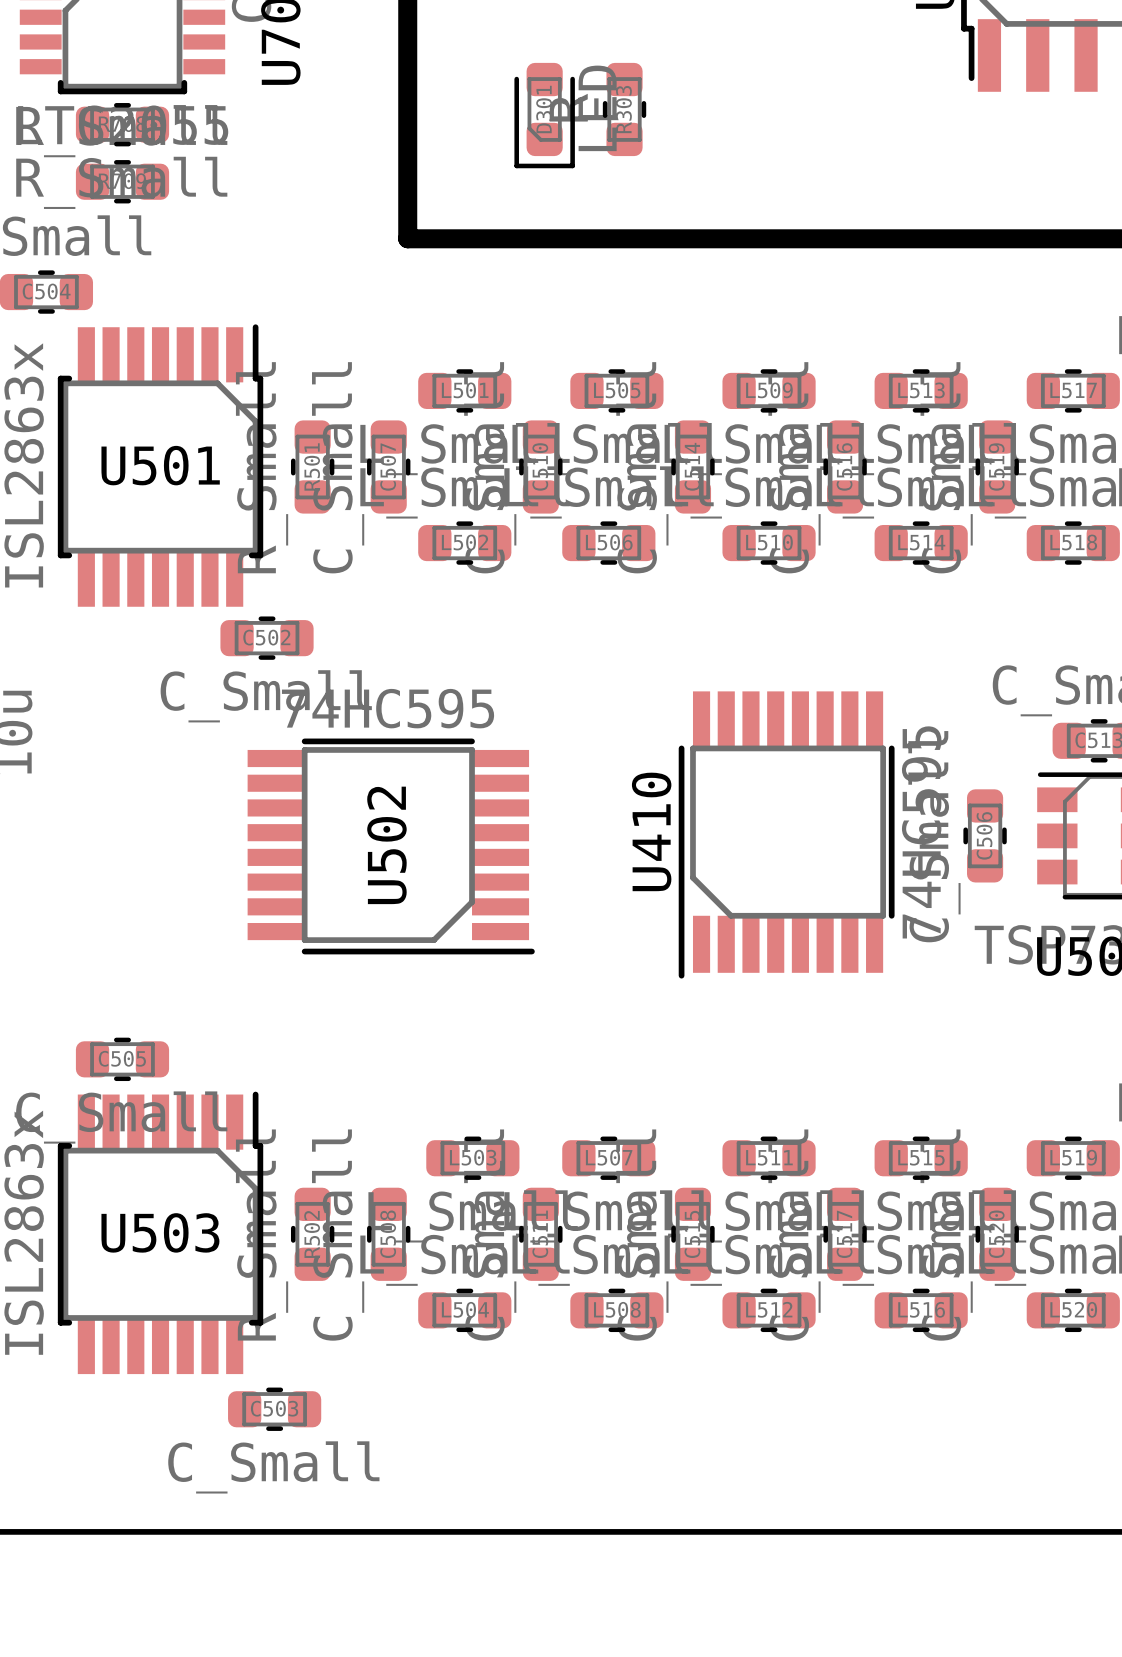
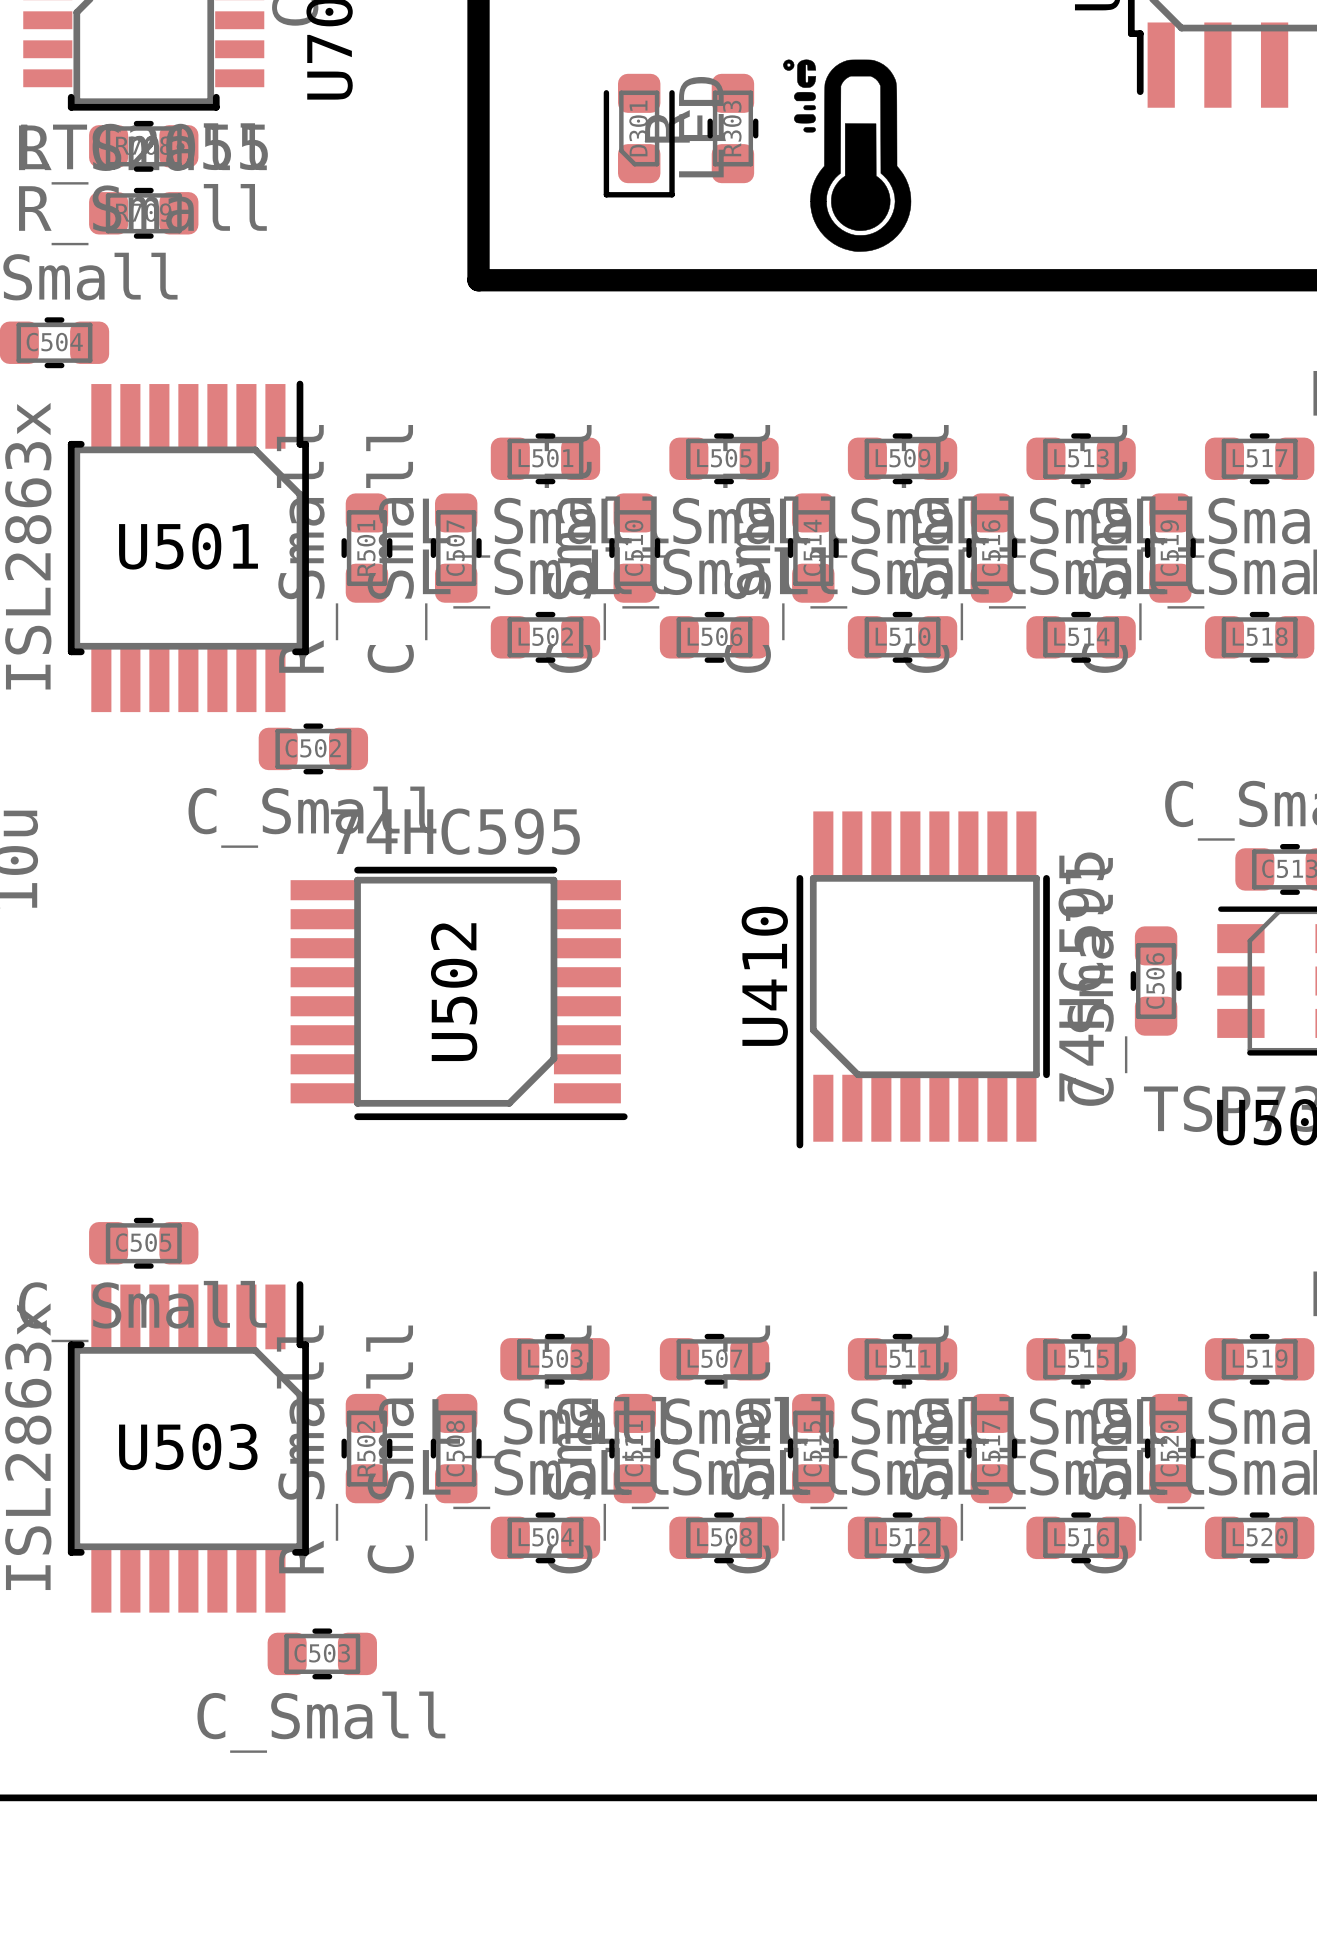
drawing: none -> [783, 59, 912, 252]

